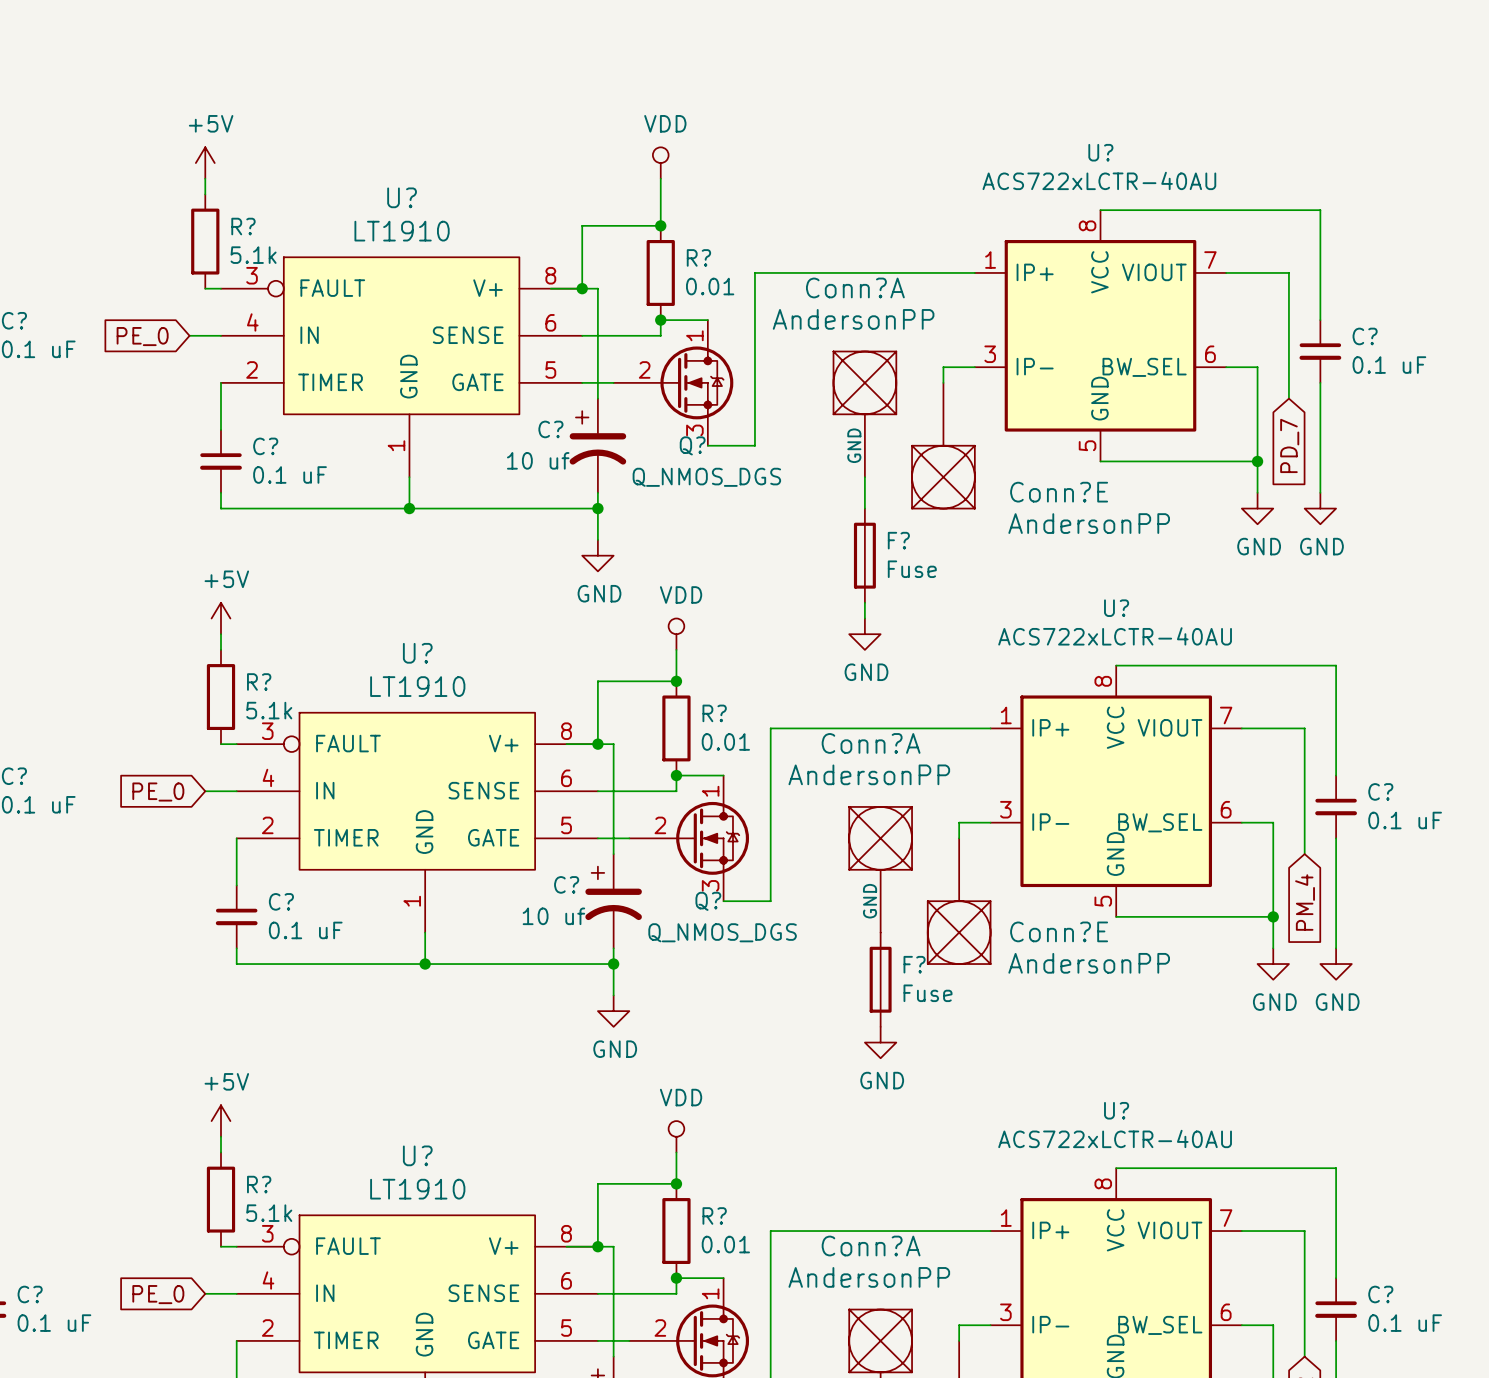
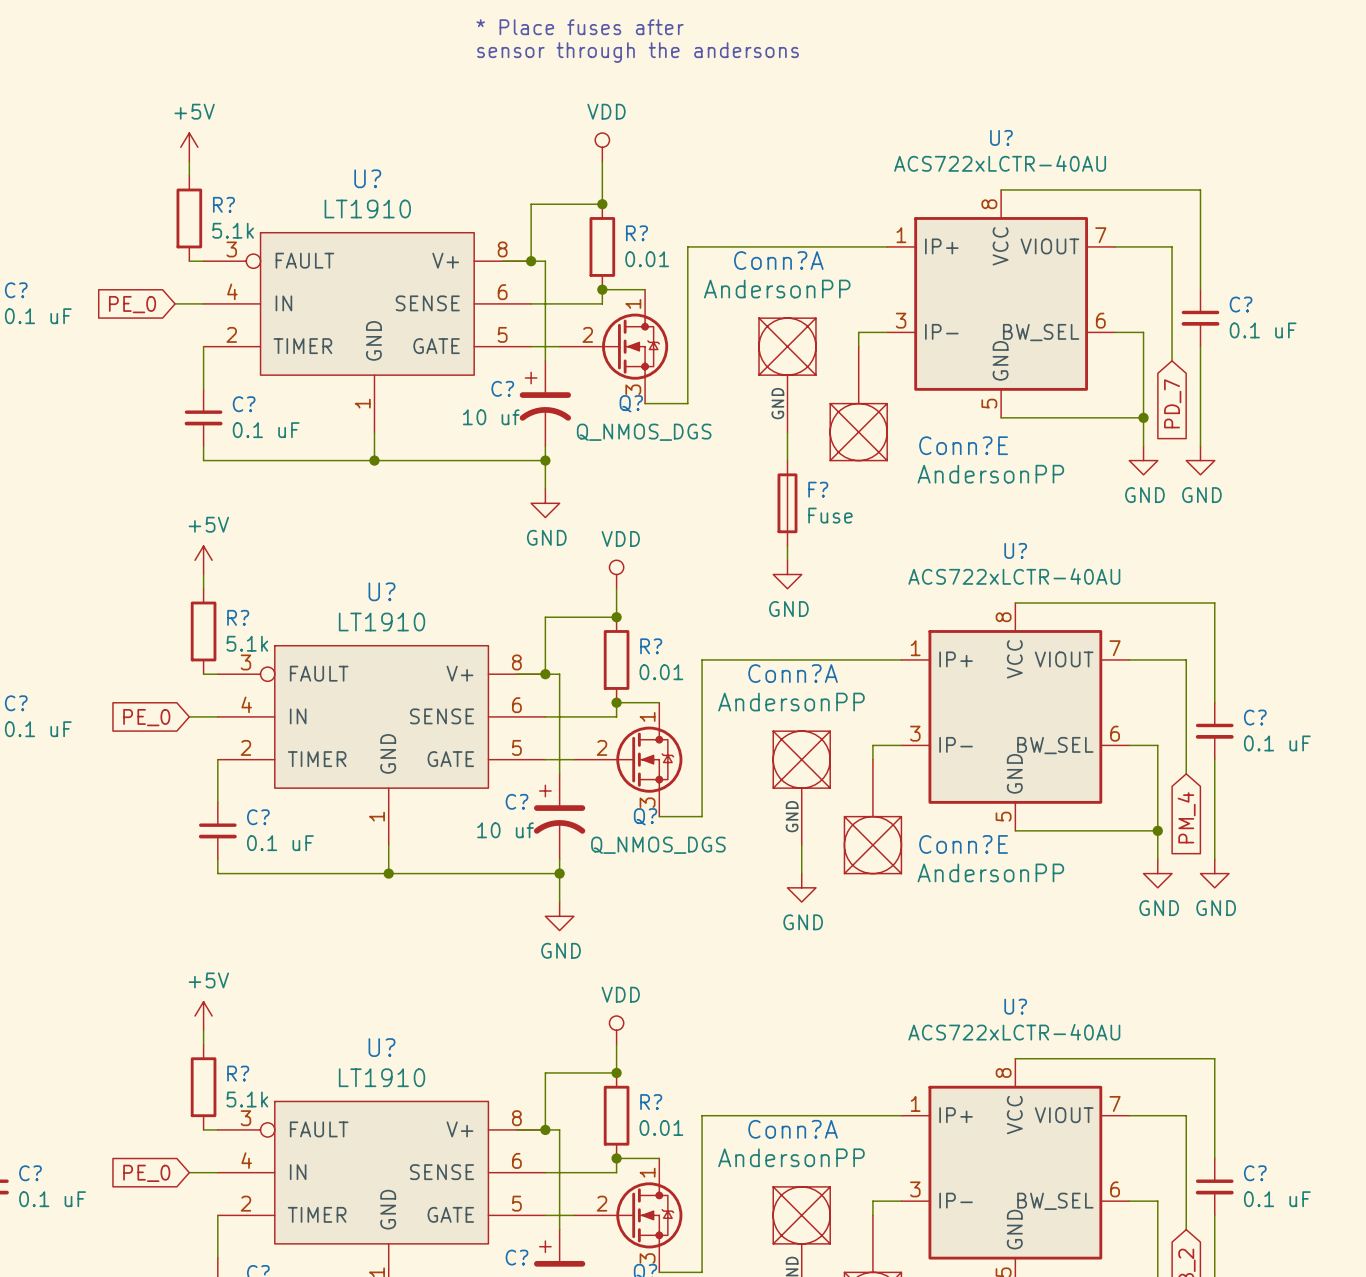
text: none -> * Place fuses after (580, 27)
text: none -> sensor through the andersons (638, 52)
F?: Fuse (880, 979) -> none
power symbol position: GND (880, 1042) -> GND (801, 887)

